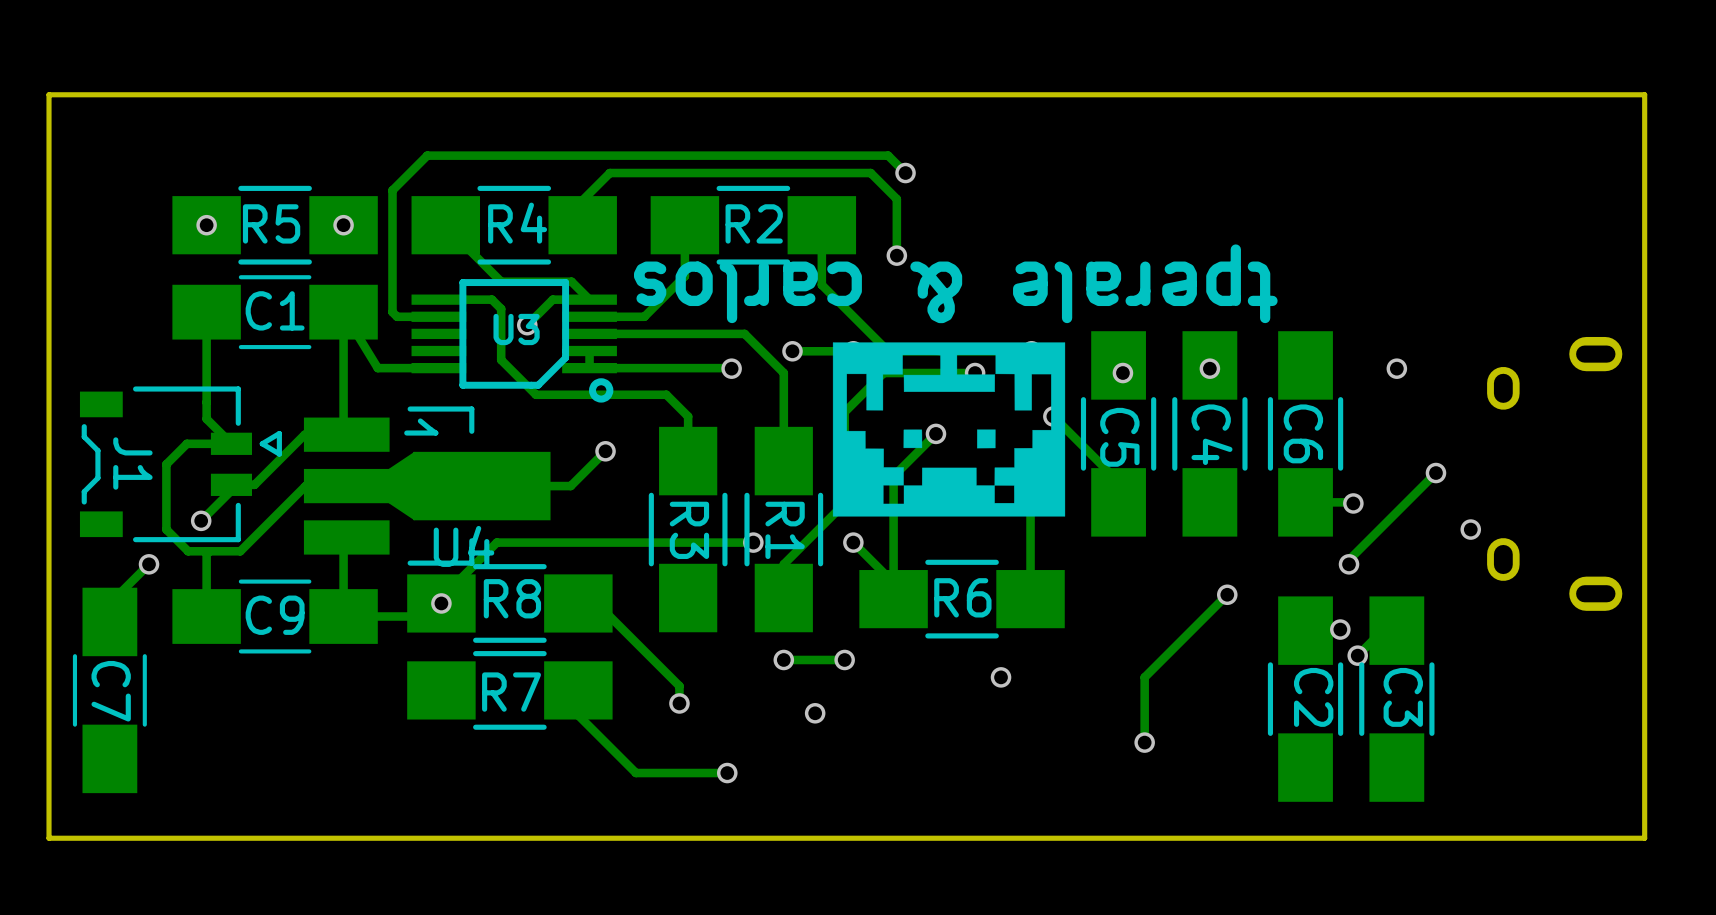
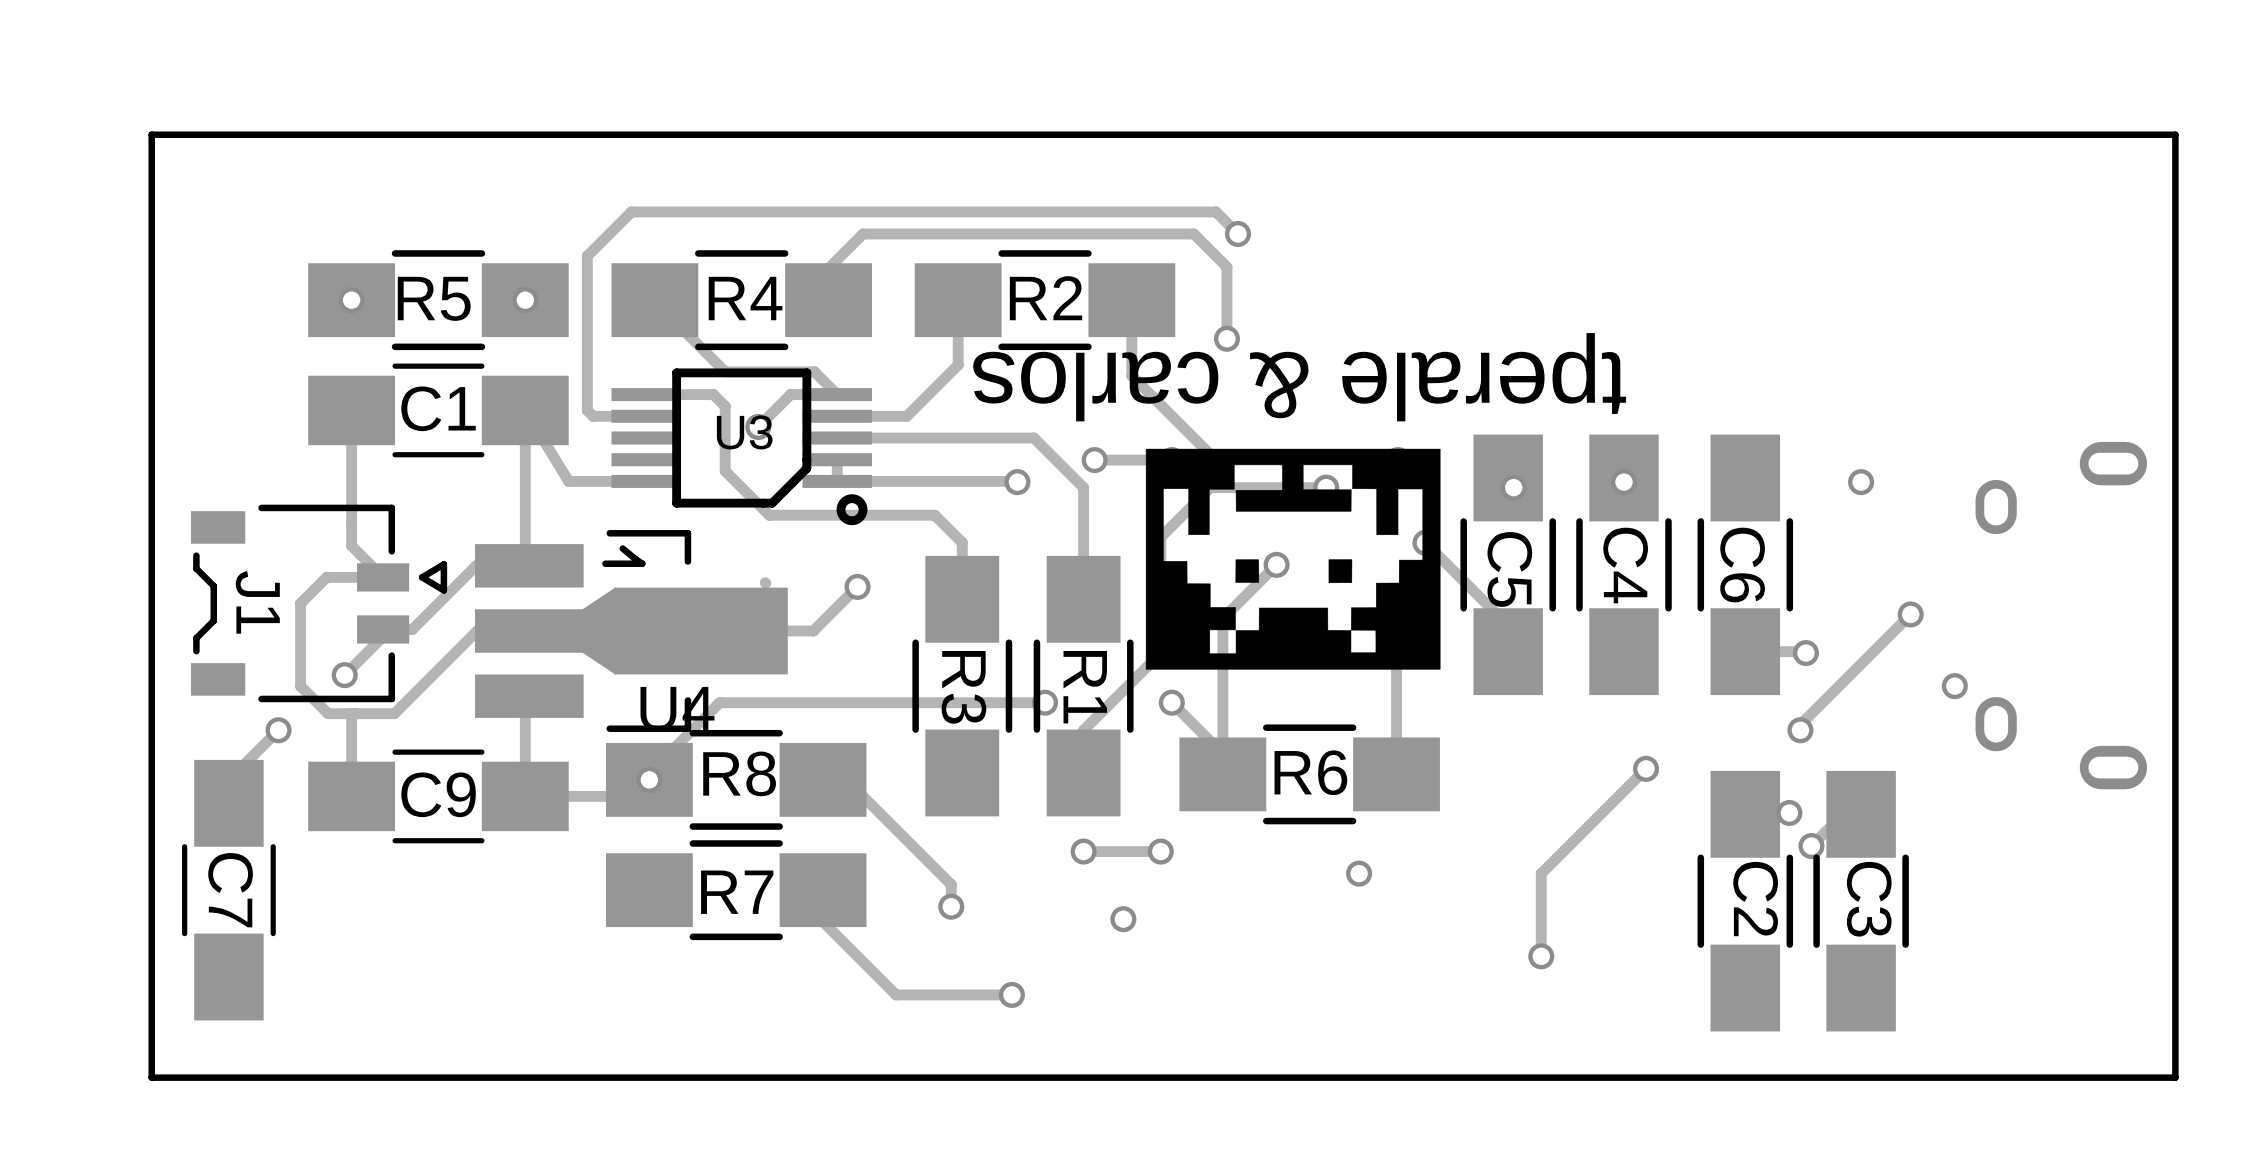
track: none -> (765, 582) (765, 583)

